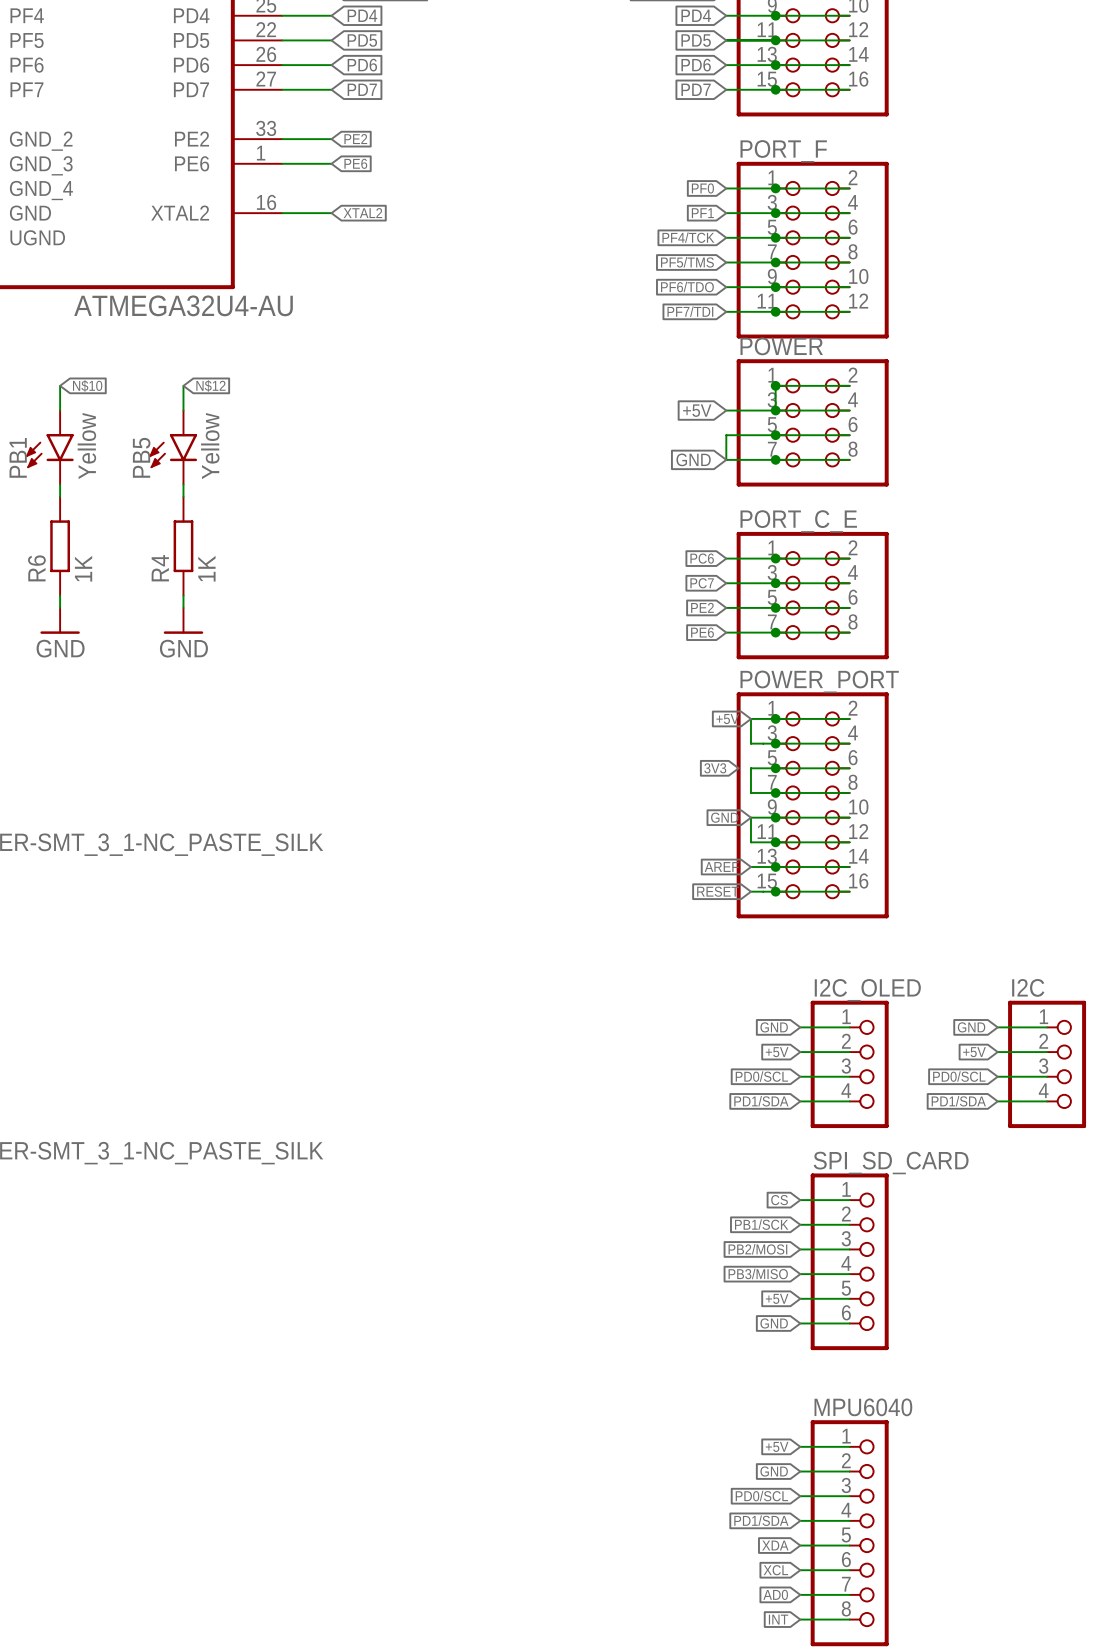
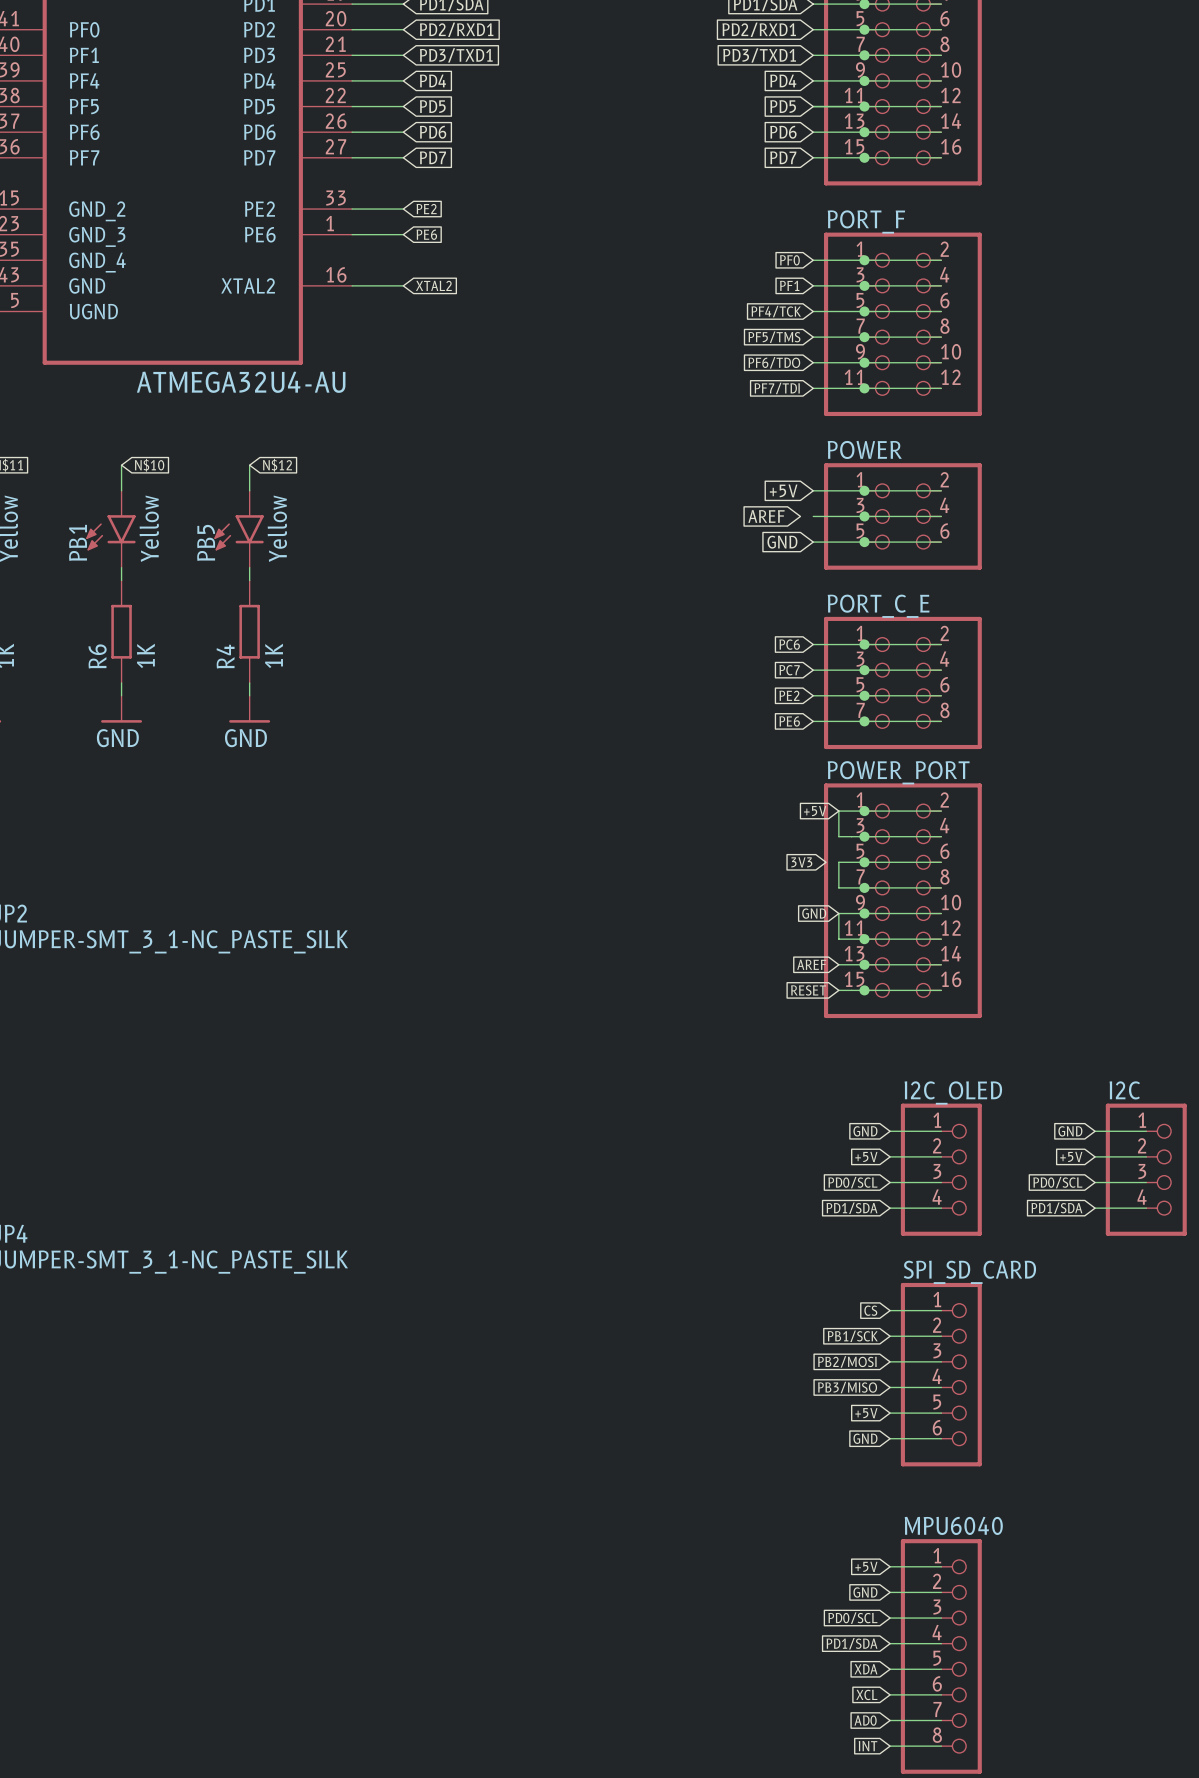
junction: (775, 385) -> none
POWER: (812, 422) -> none
global label: none -> AREF (766, 516)
wire: (726, 435) (726, 459) -> none
POWER: none -> (902, 516)

